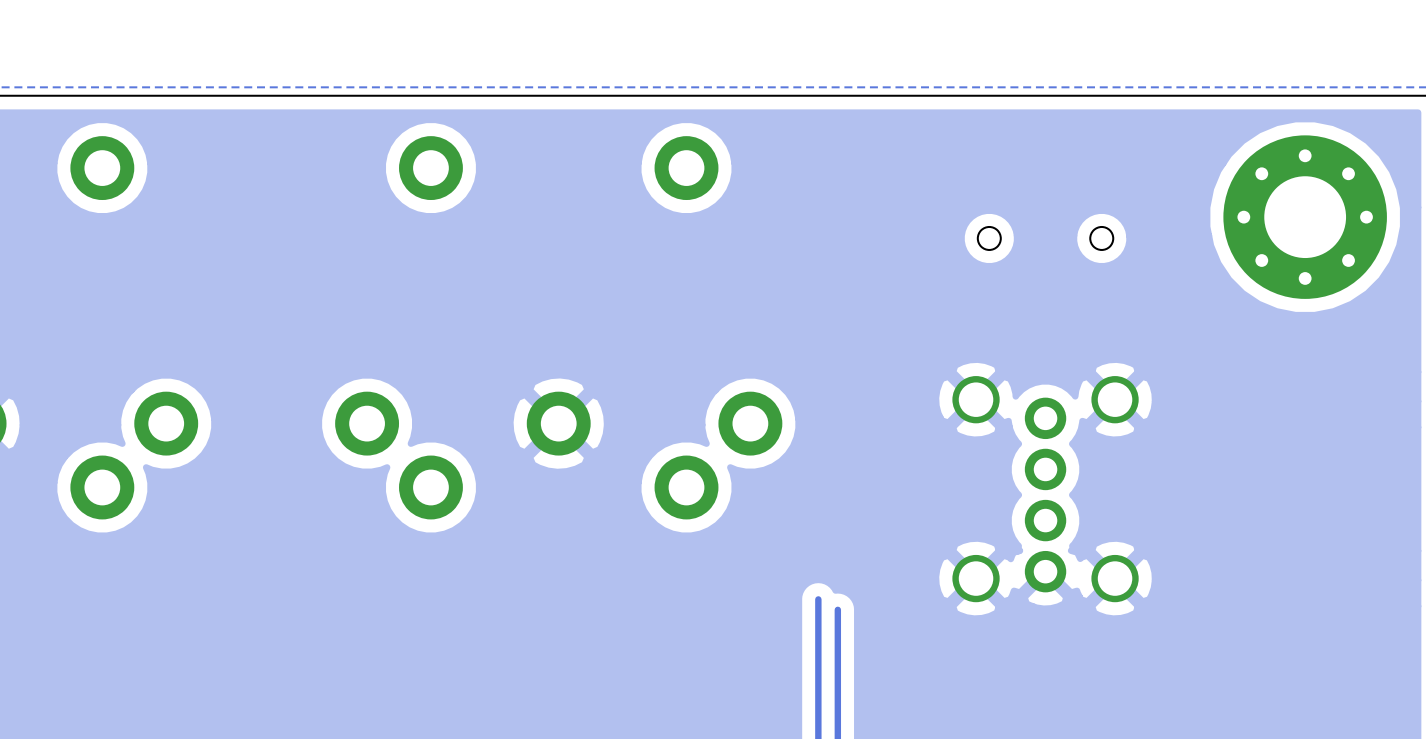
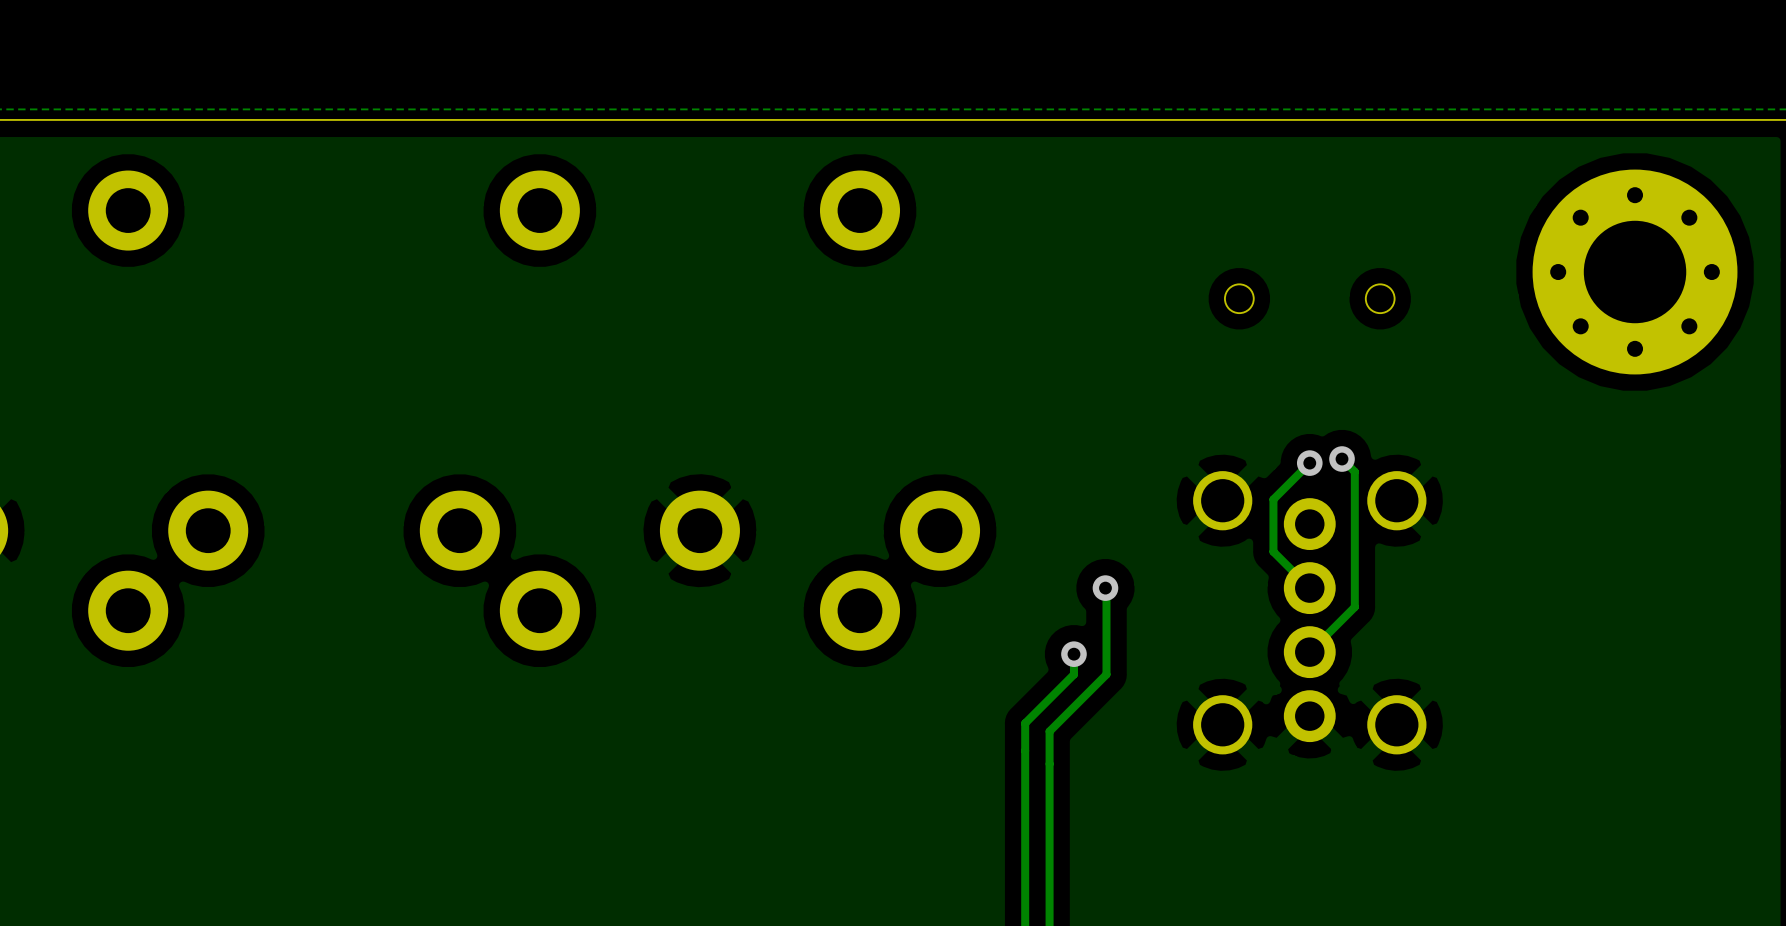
track: none -> (1342, 459) (1354, 471) (1354, 607) (1309, 652)
via: none -> (1342, 459)
track: none -> (1309, 463) (1273, 499) (1273, 551) (1309, 588)
via: none -> (1309, 463)
via: none -> (1105, 588)
track: none -> (1106, 589) (1106, 674) (1049, 731) (1049, 763)
track: none -> (1073, 650) (1073, 674) (1025, 723) (1025, 750)
via: none -> (1073, 654)

